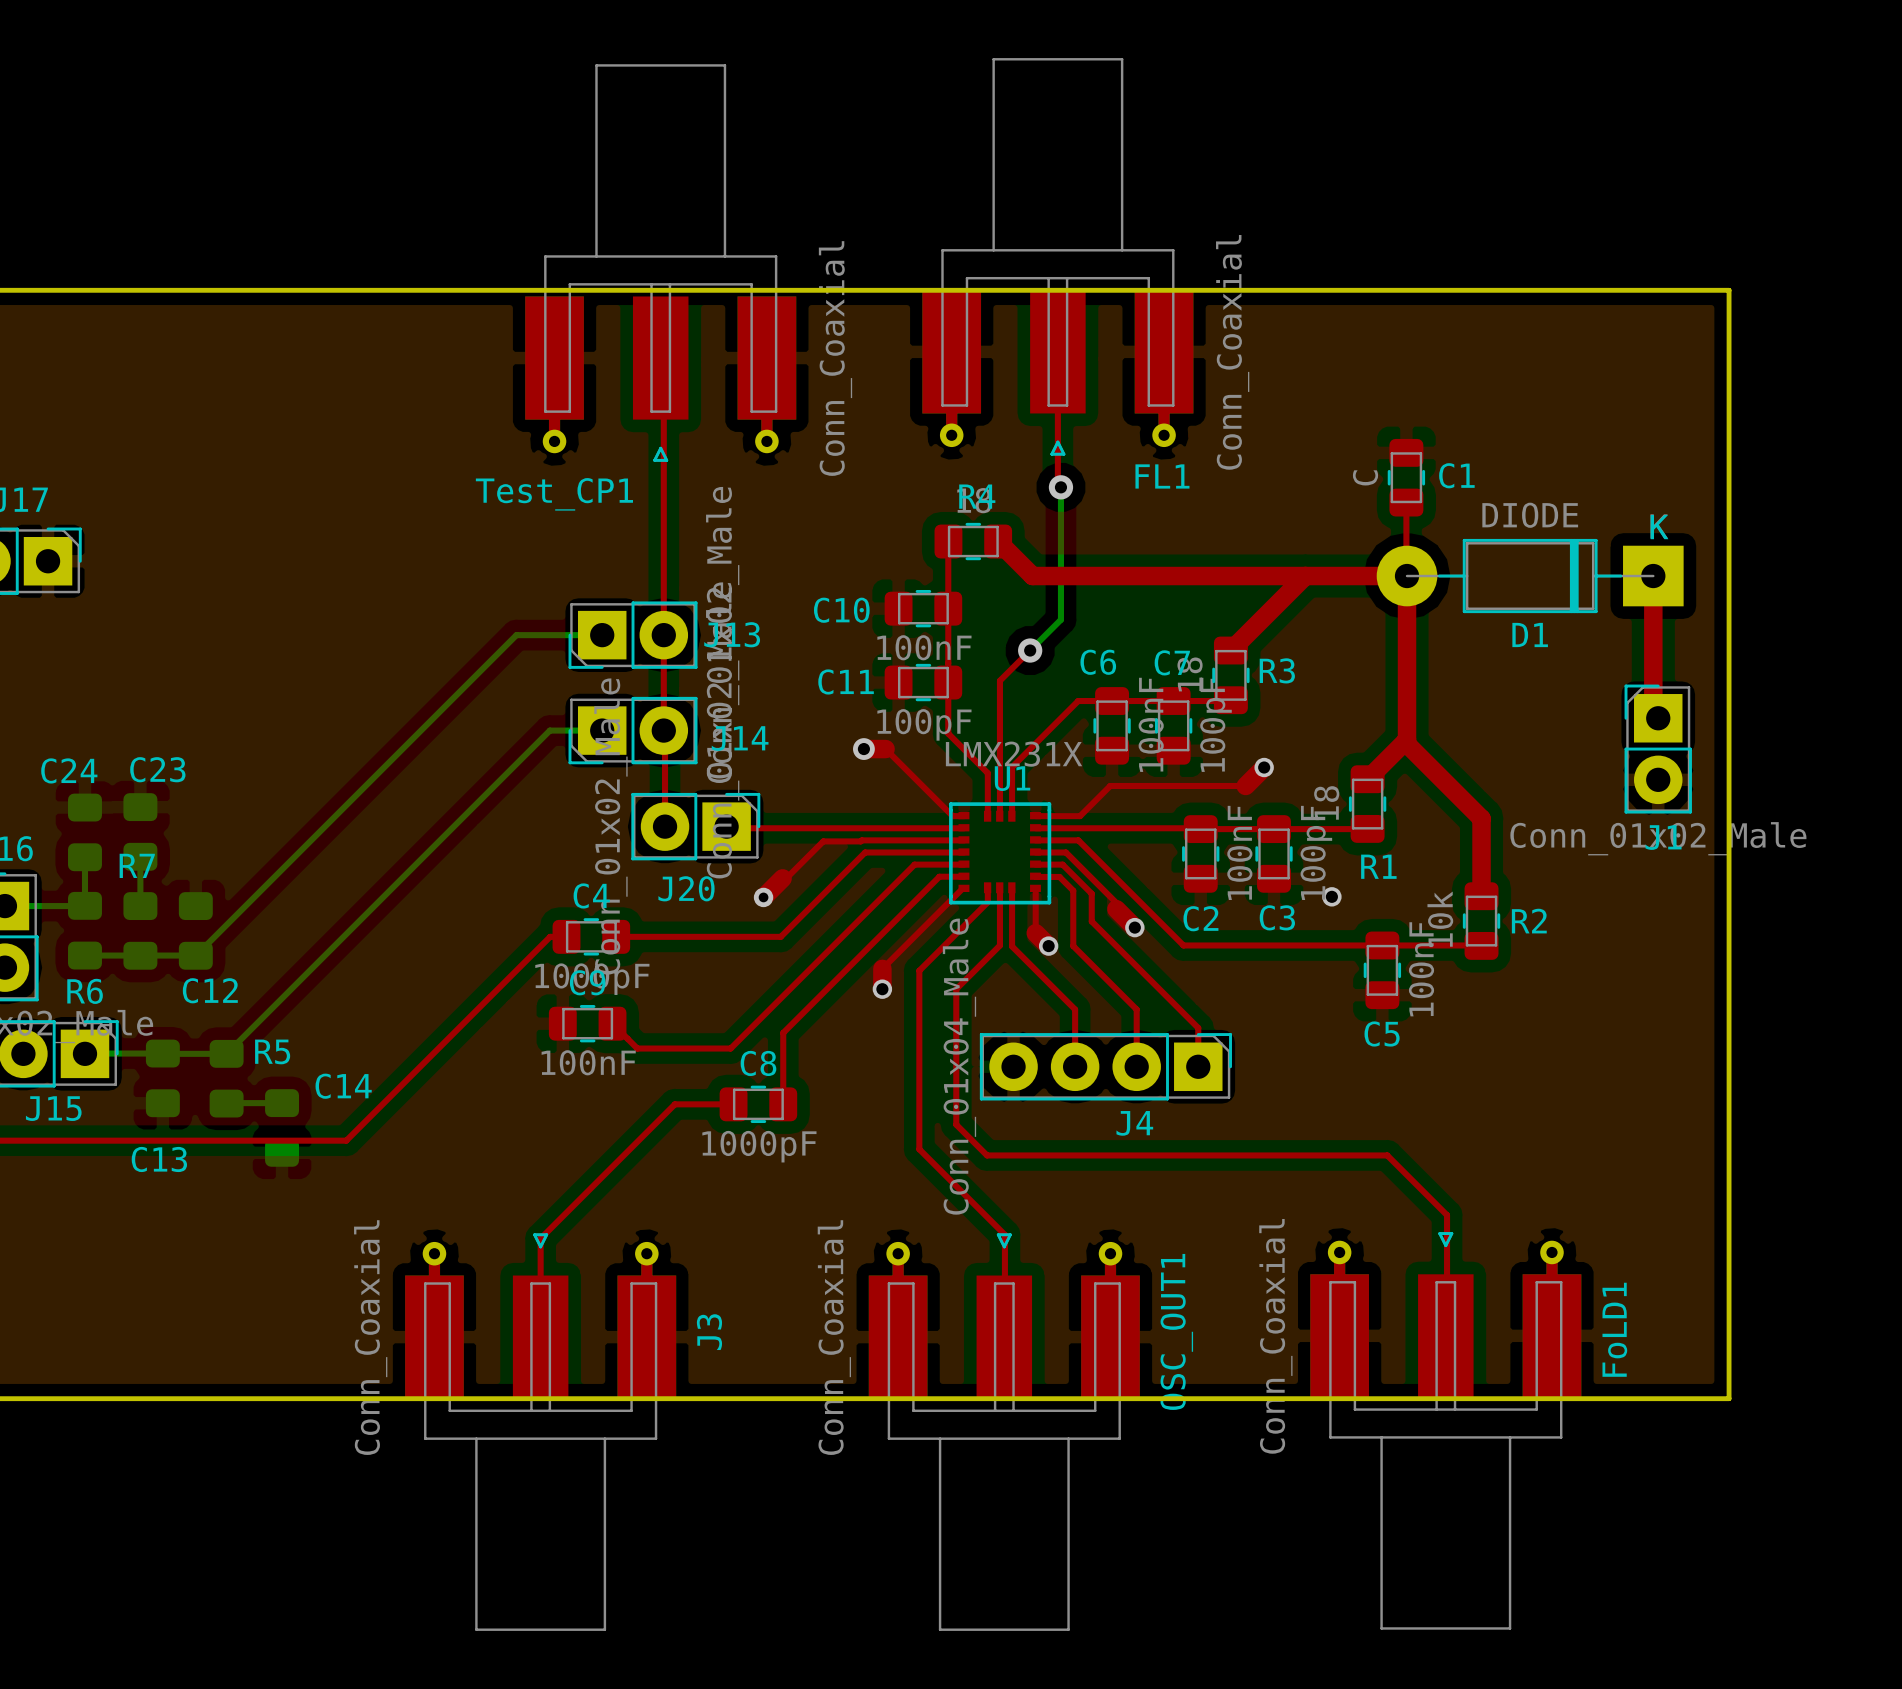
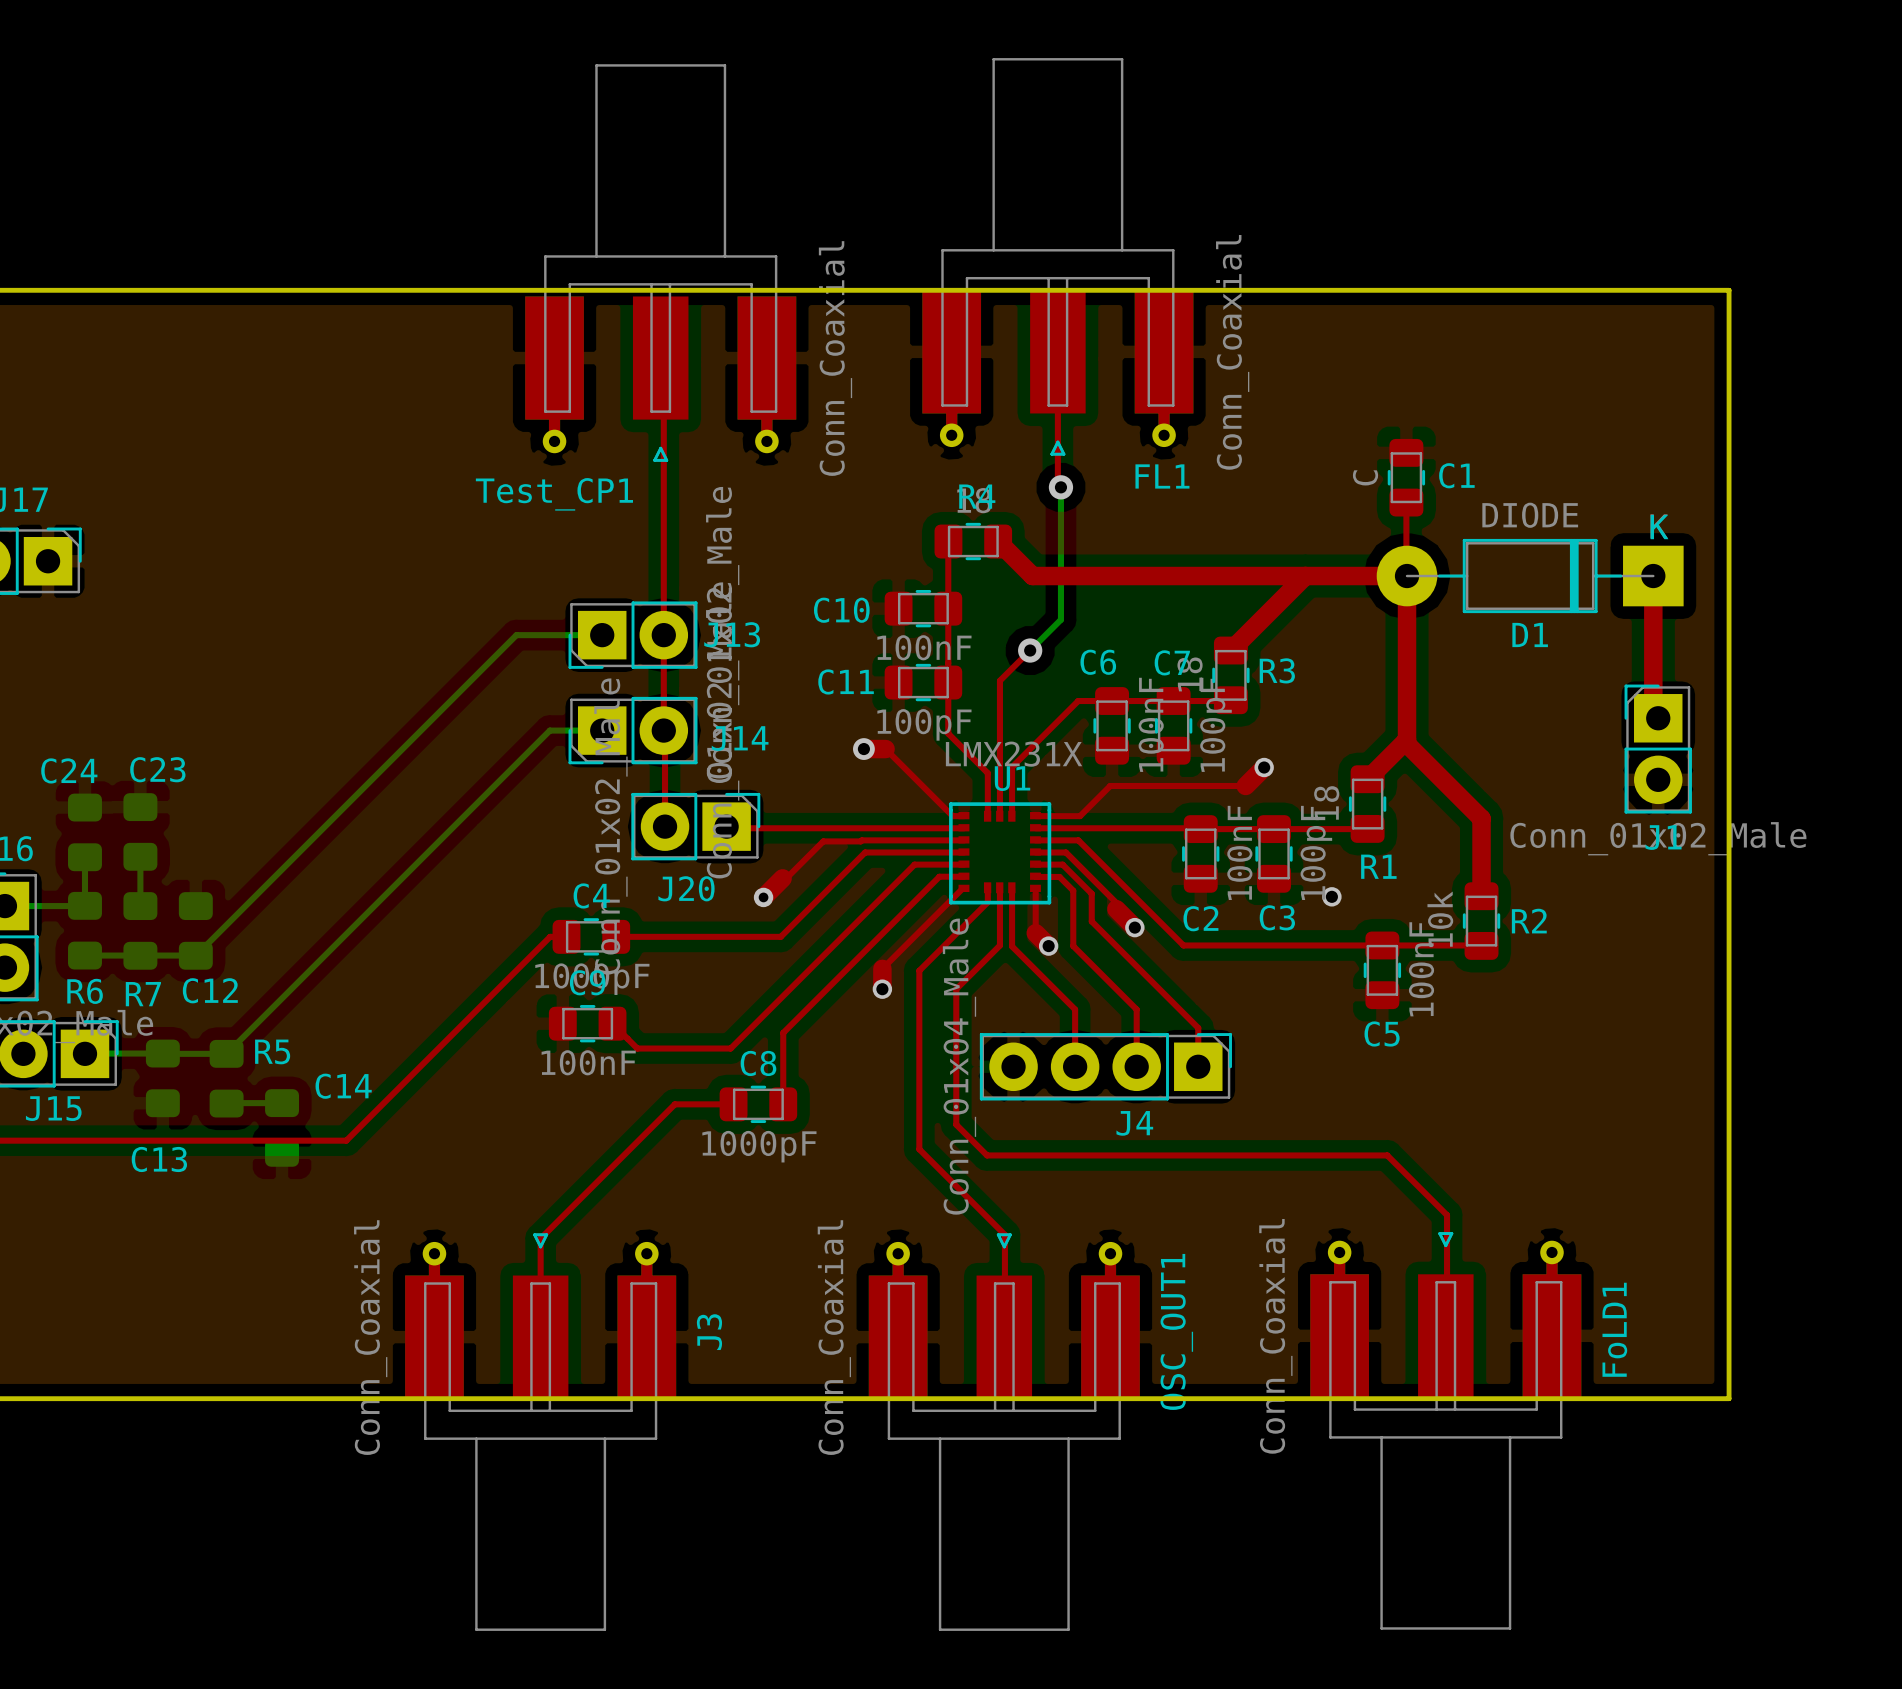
R7 name position: R7 (137, 865) -> R7 (143, 994)

